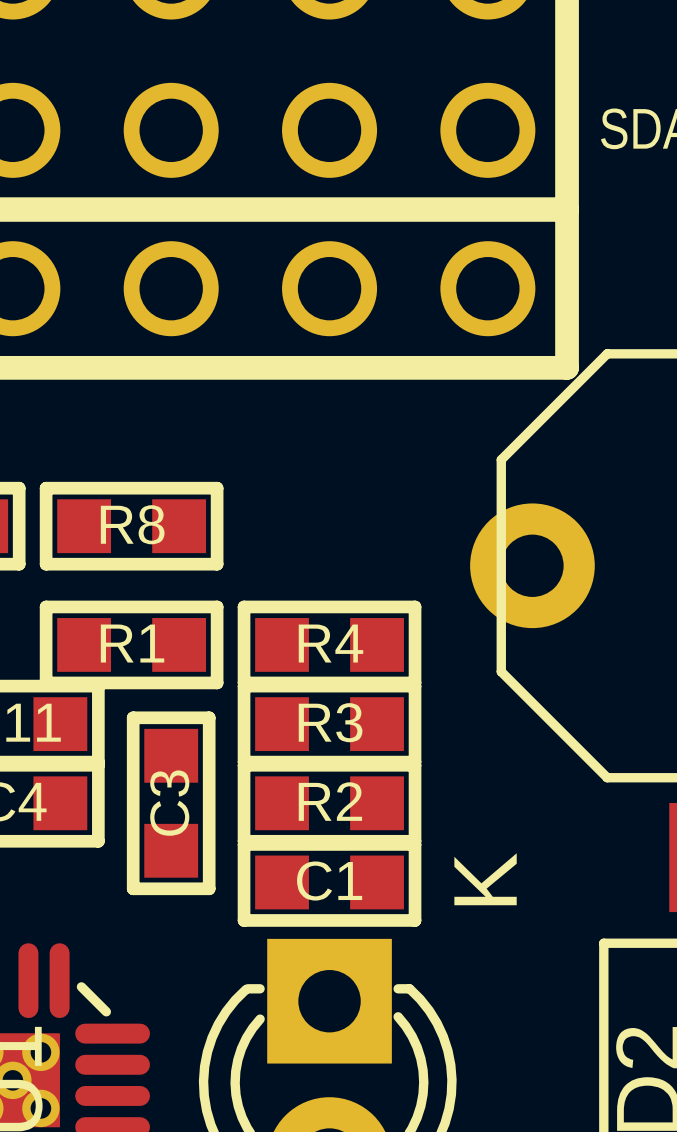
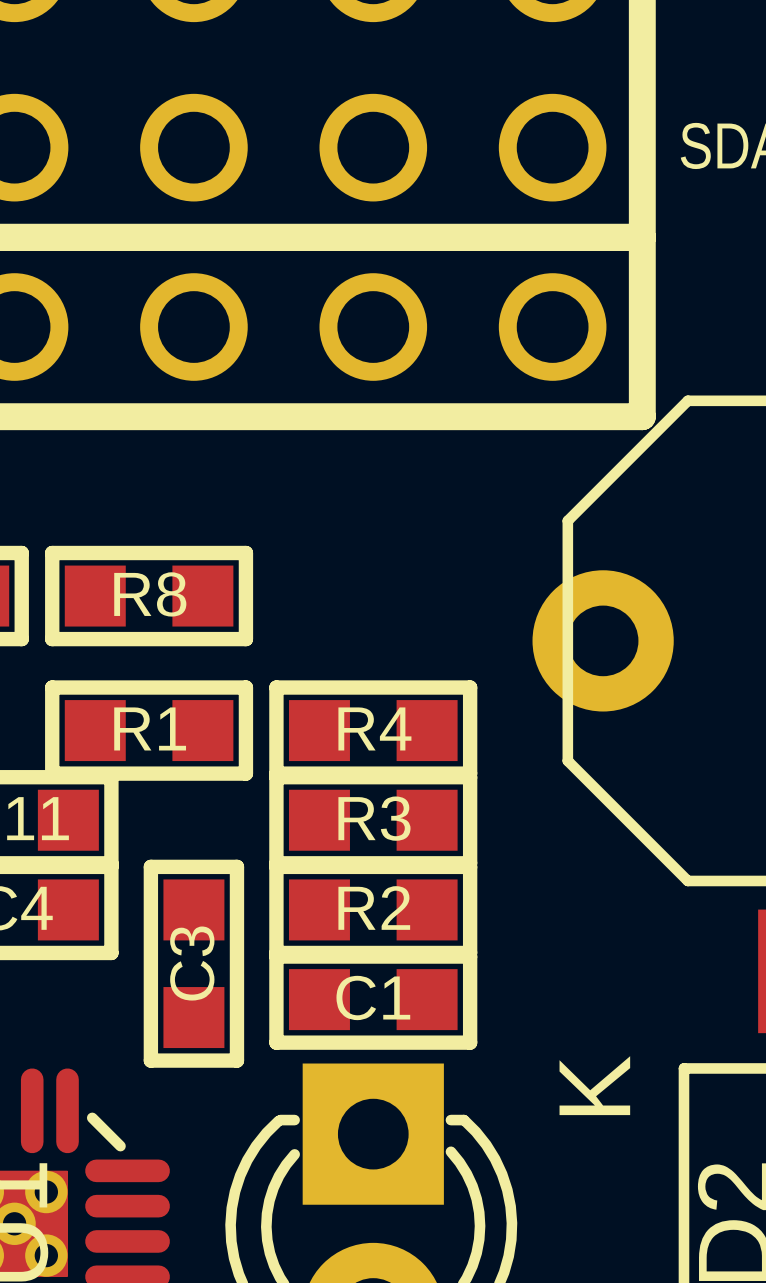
C3 position: (171, 803) -> (193, 963)
part text position: K (485, 879) -> K (594, 1085)

